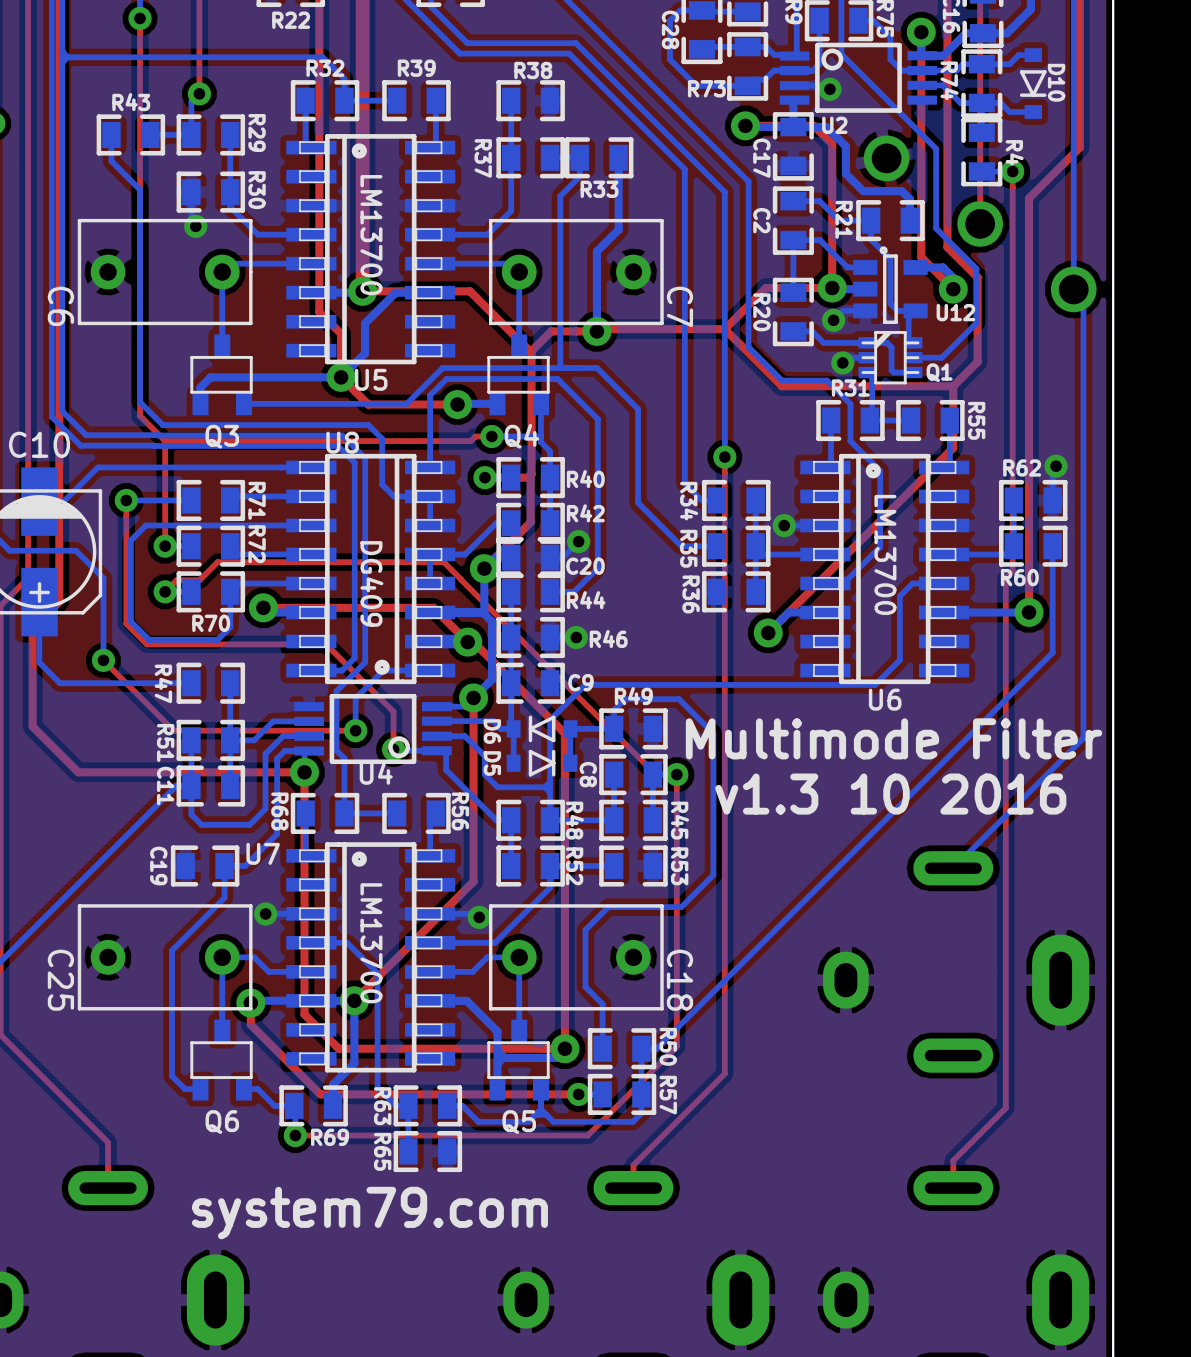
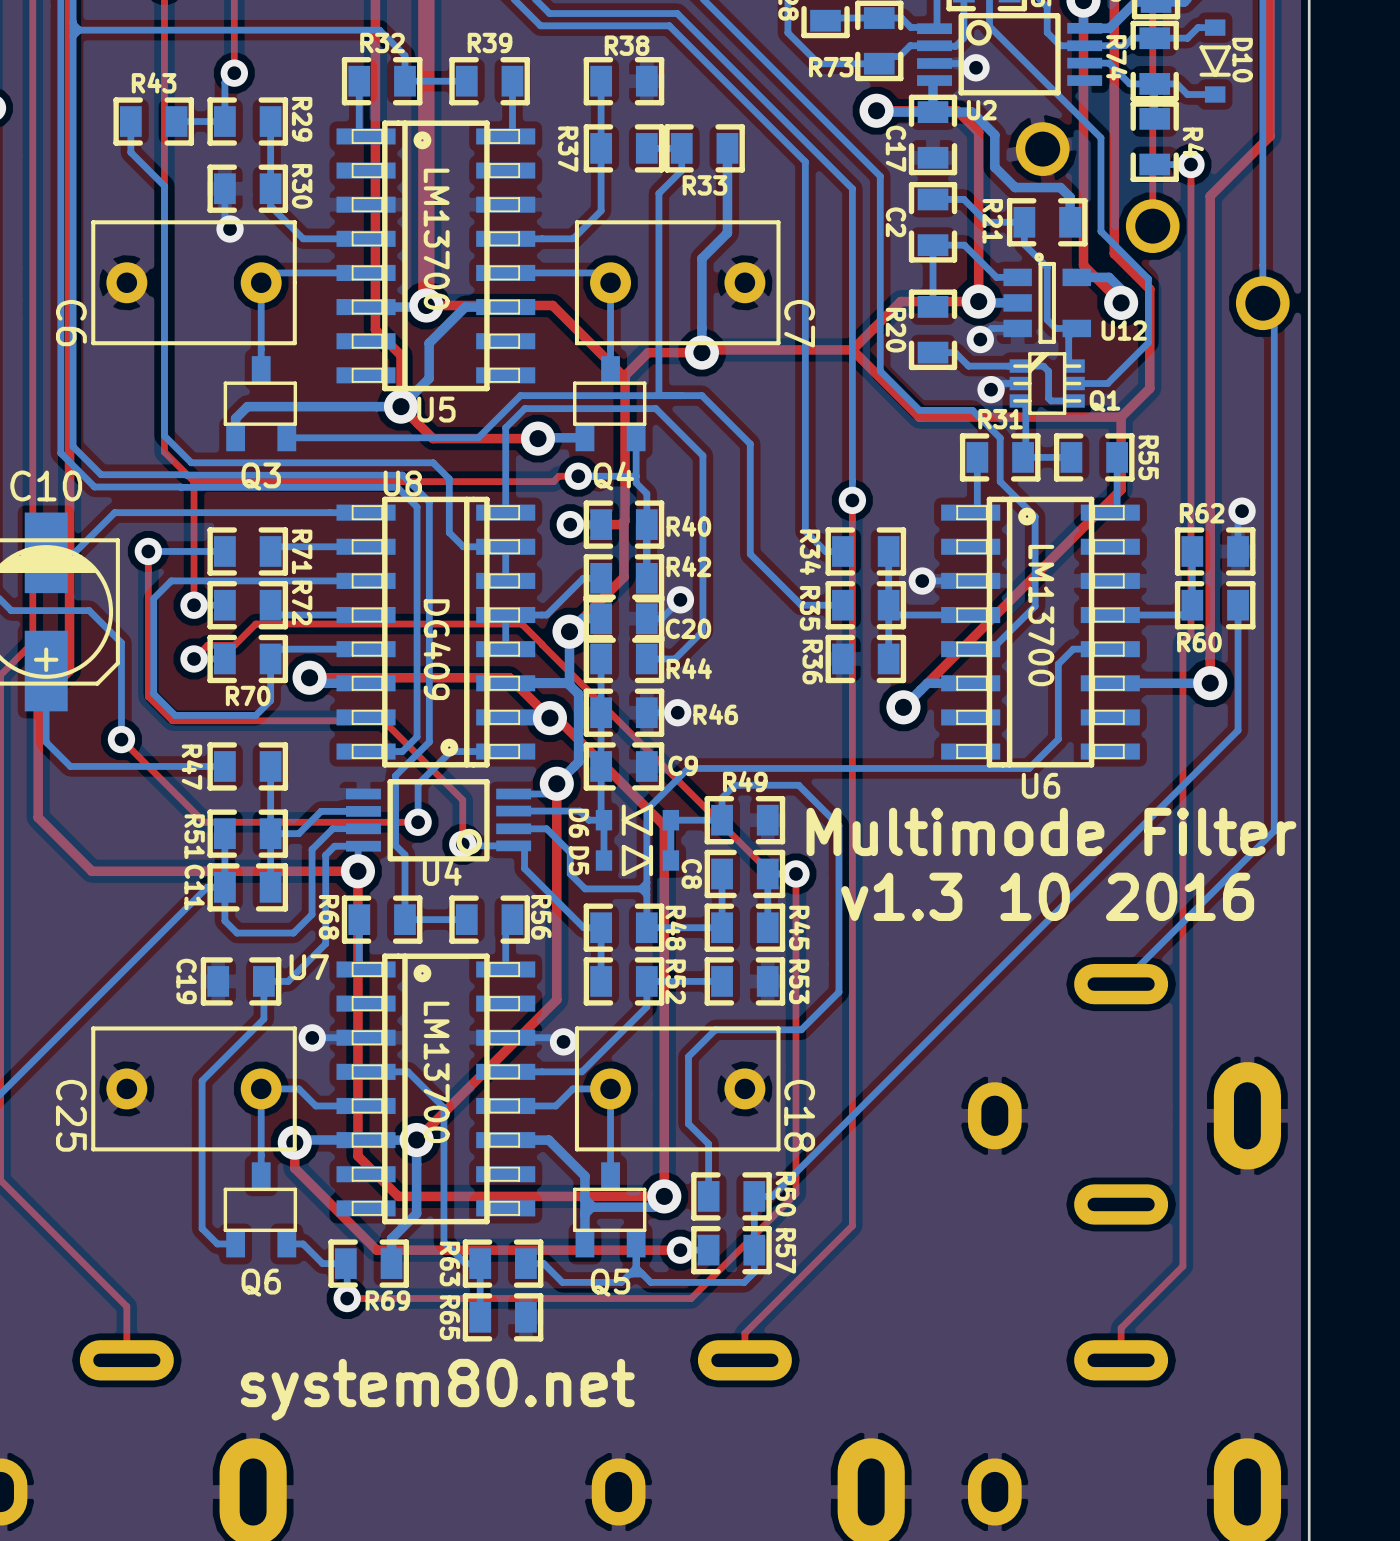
text: system79.com (369, 1213) -> system80.net (437, 1389)

